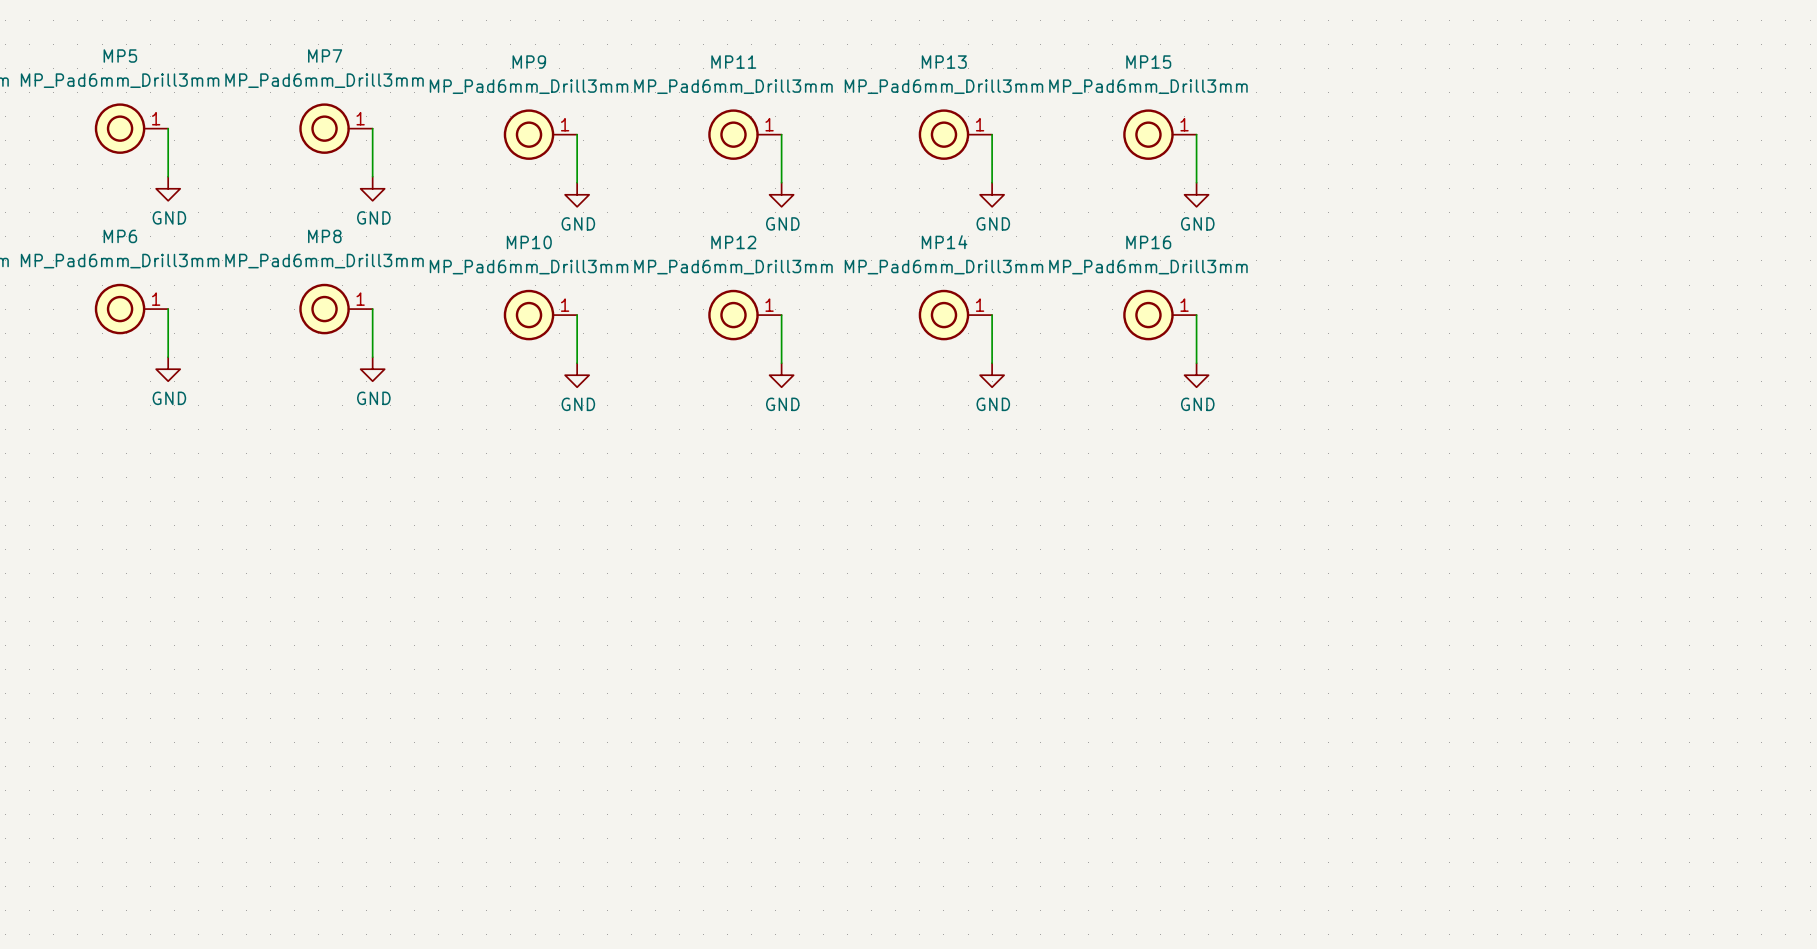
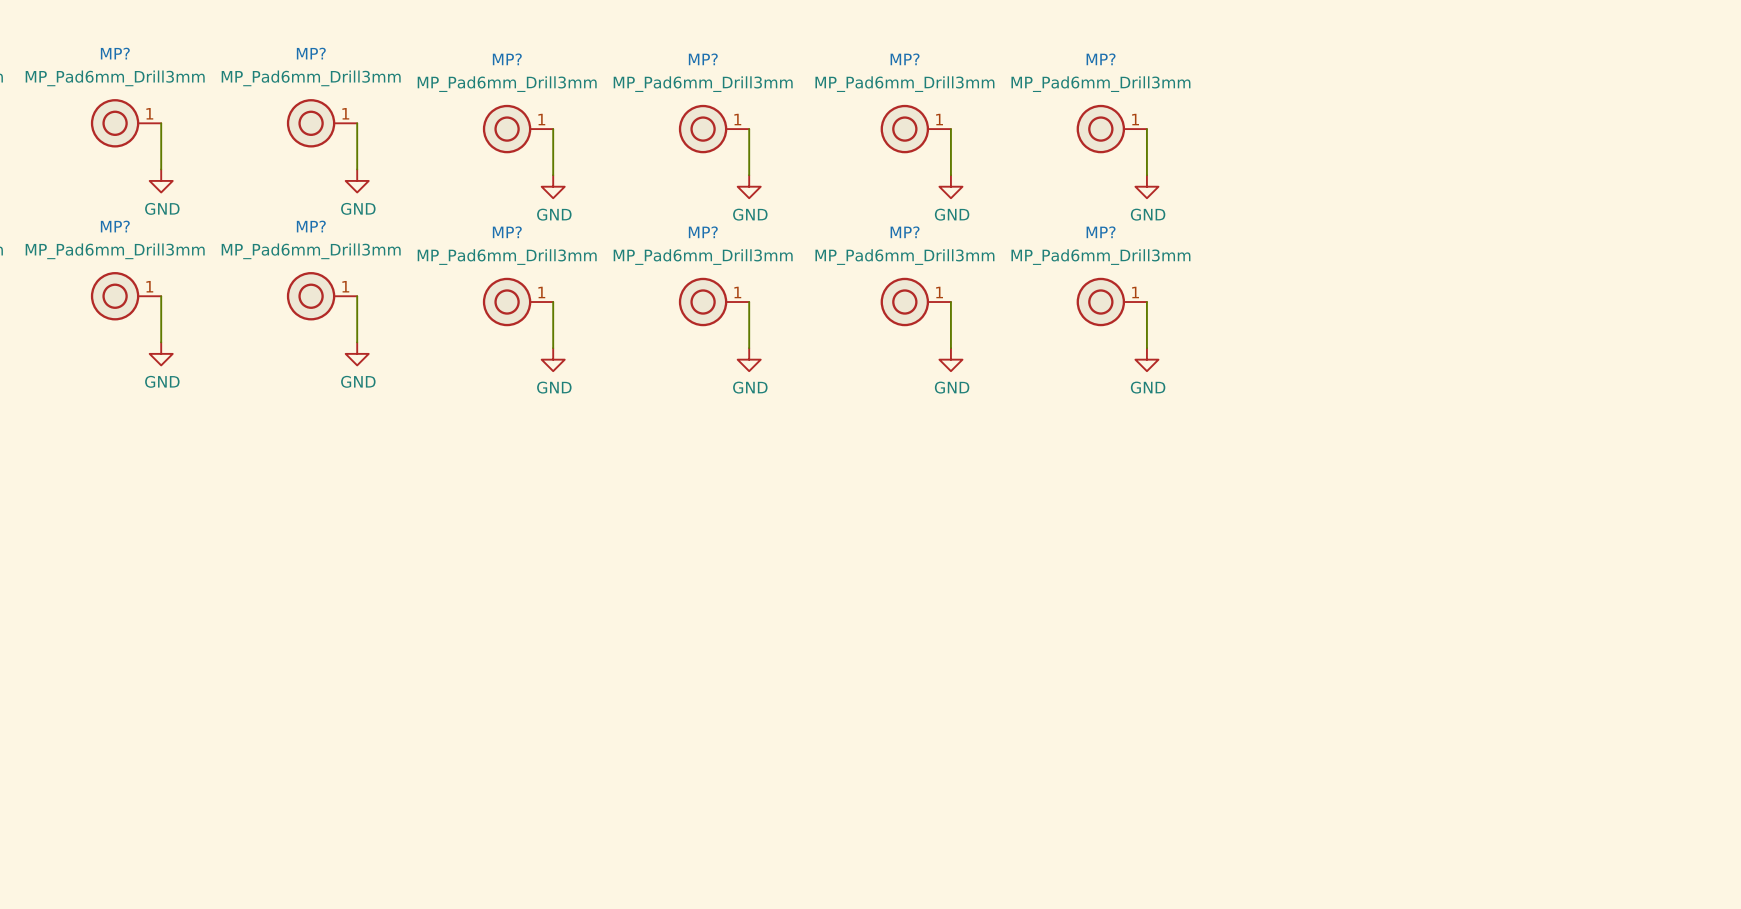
MP5 name: MP5 (120, 56) -> MP? (115, 53)
MP7 name: MP7 (325, 56) -> MP? (311, 53)
MP9 name: MP9 (529, 62) -> MP? (507, 59)
MP11 name: MP11 (733, 62) -> MP? (703, 59)
MP13 name: MP13 (944, 62) -> MP? (905, 59)
MP15 name: MP15 (1148, 62) -> MP? (1101, 59)
MP6 name: MP6 (120, 236) -> MP? (115, 226)
MP8 name: MP8 (324, 236) -> MP? (311, 226)
MP10 name: MP10 (529, 242) -> MP? (507, 232)
MP12 name: MP12 (733, 242) -> MP? (703, 232)
MP14 name: MP14 (944, 242) -> MP? (905, 232)
MP16 name: MP16 (1148, 242) -> MP? (1101, 232)

